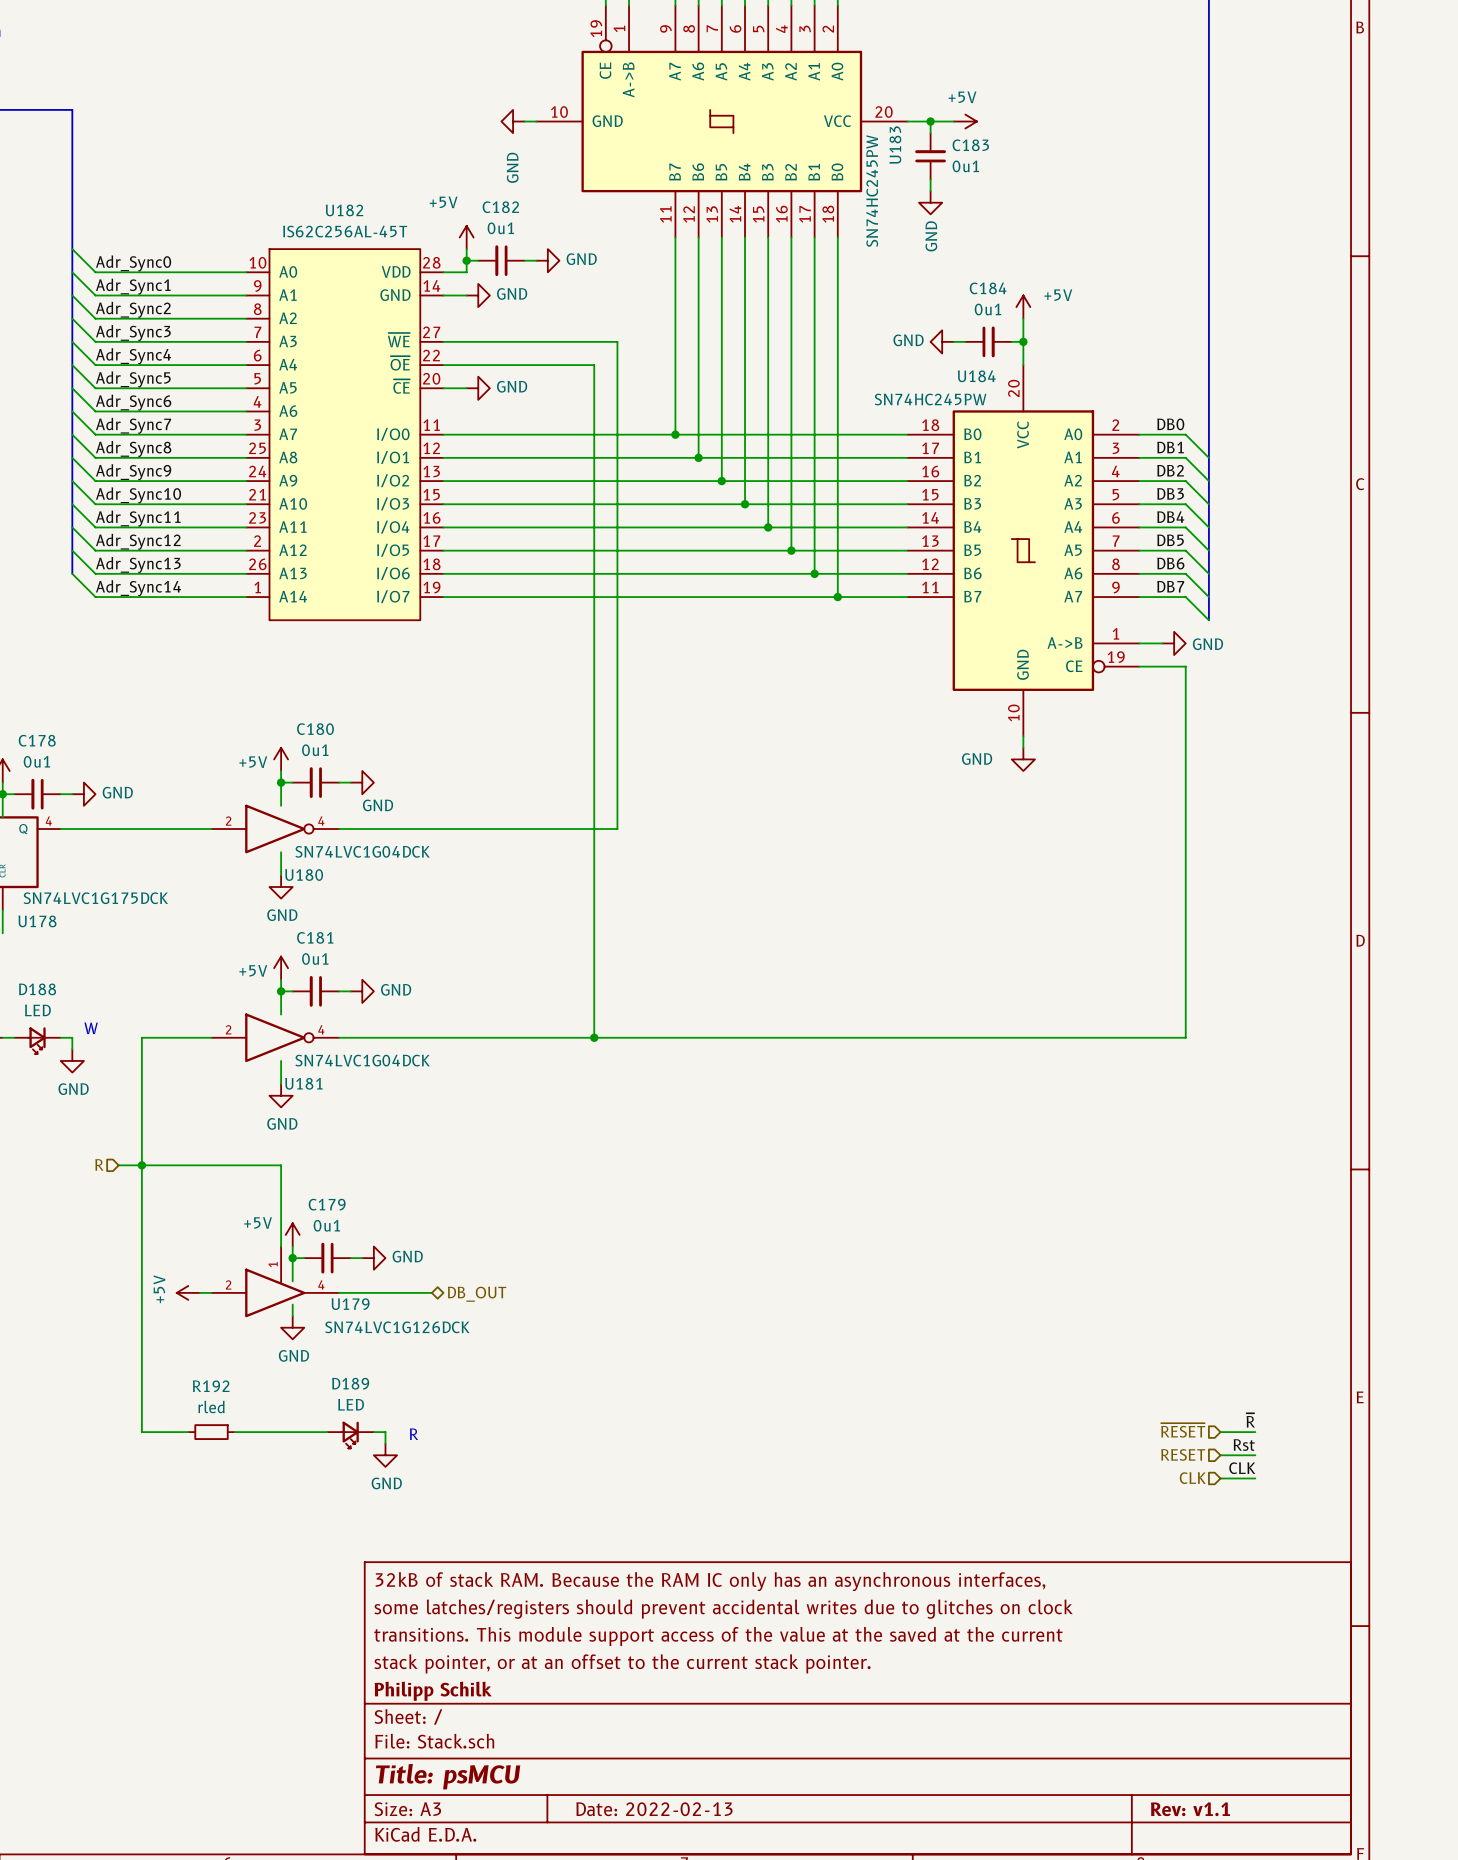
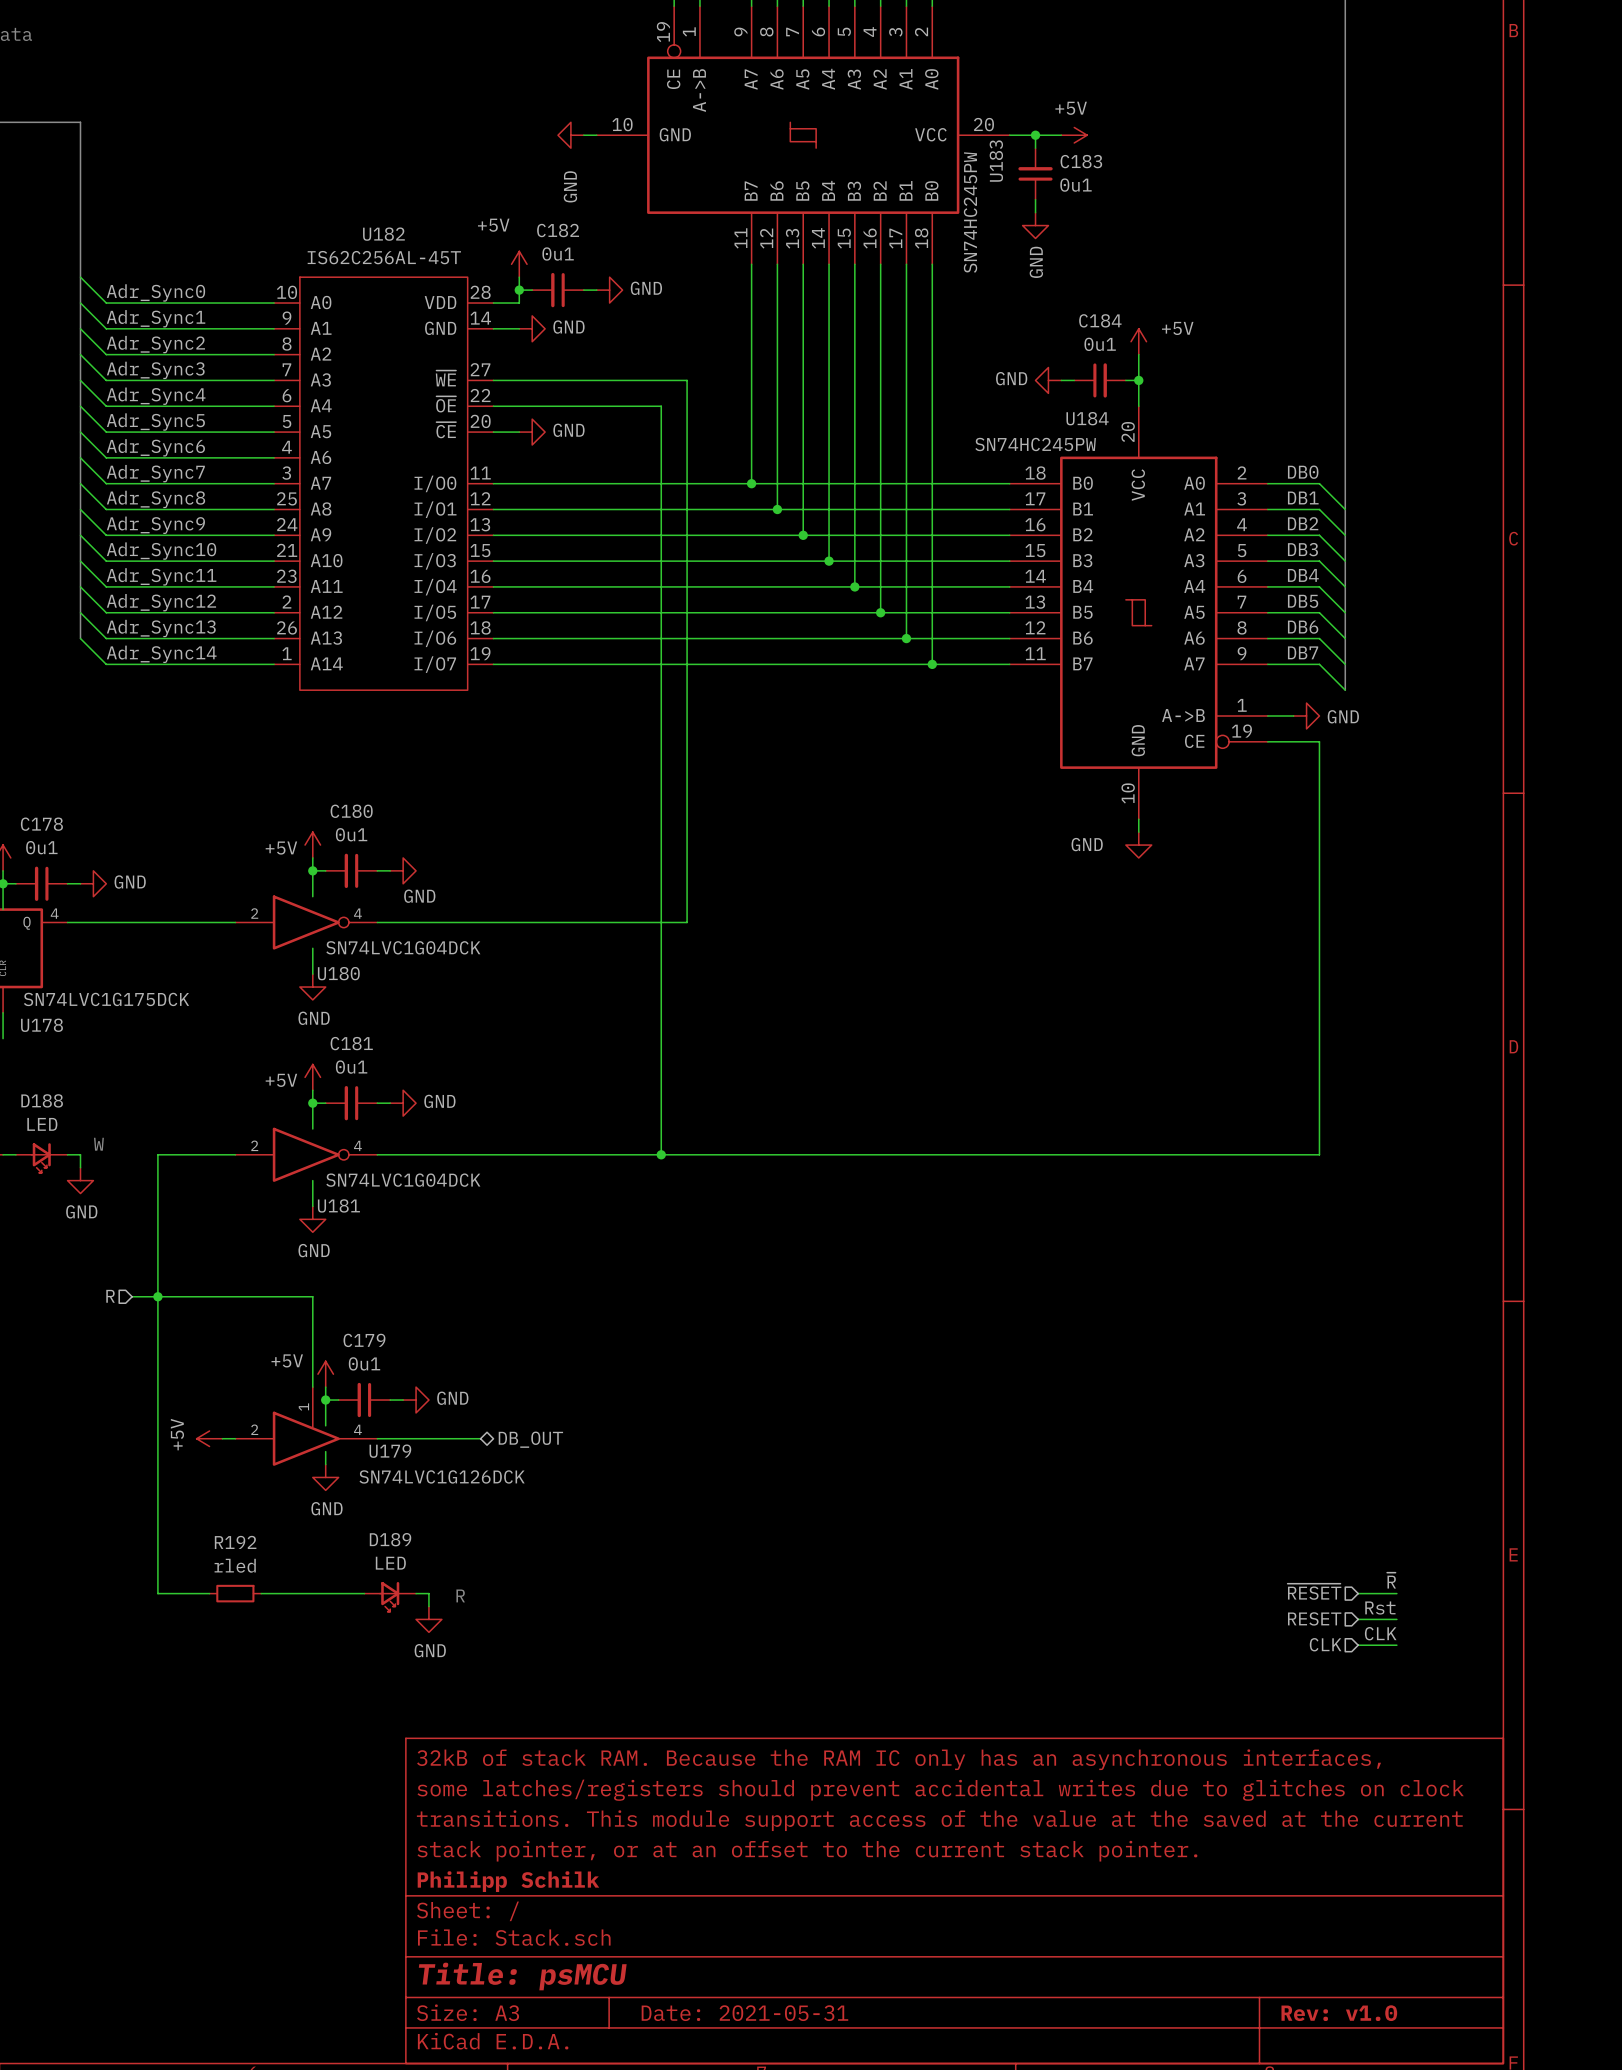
title block: Date: 2022-02-13 (654, 1809) -> Date: 2021-05-31 (744, 2013)
title block: Rev: v1.1 (1190, 1809) -> Rev: v1.0 (1339, 2013)

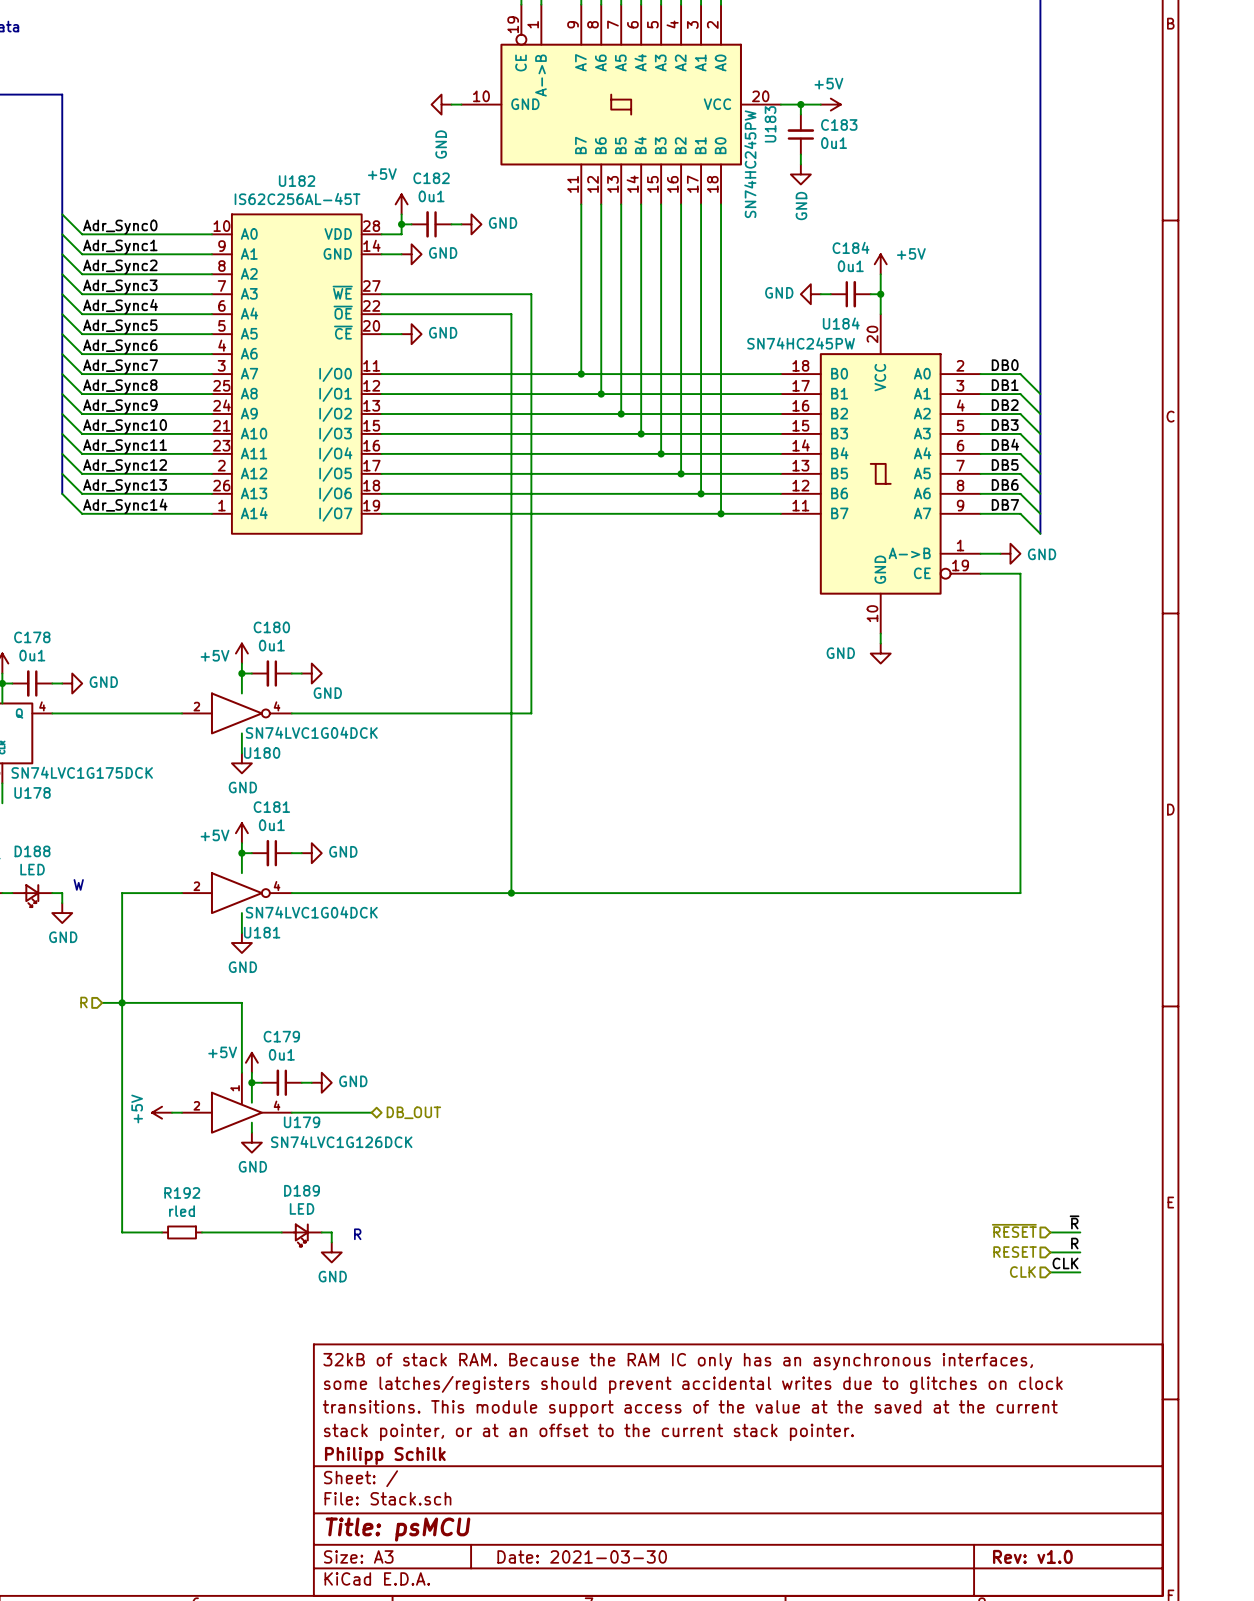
label: Rst (1380, 1608) -> R (1074, 1243)
title block: Date: 2021-05-31 (744, 2013) -> Date: 2021-03-30 (582, 1556)

